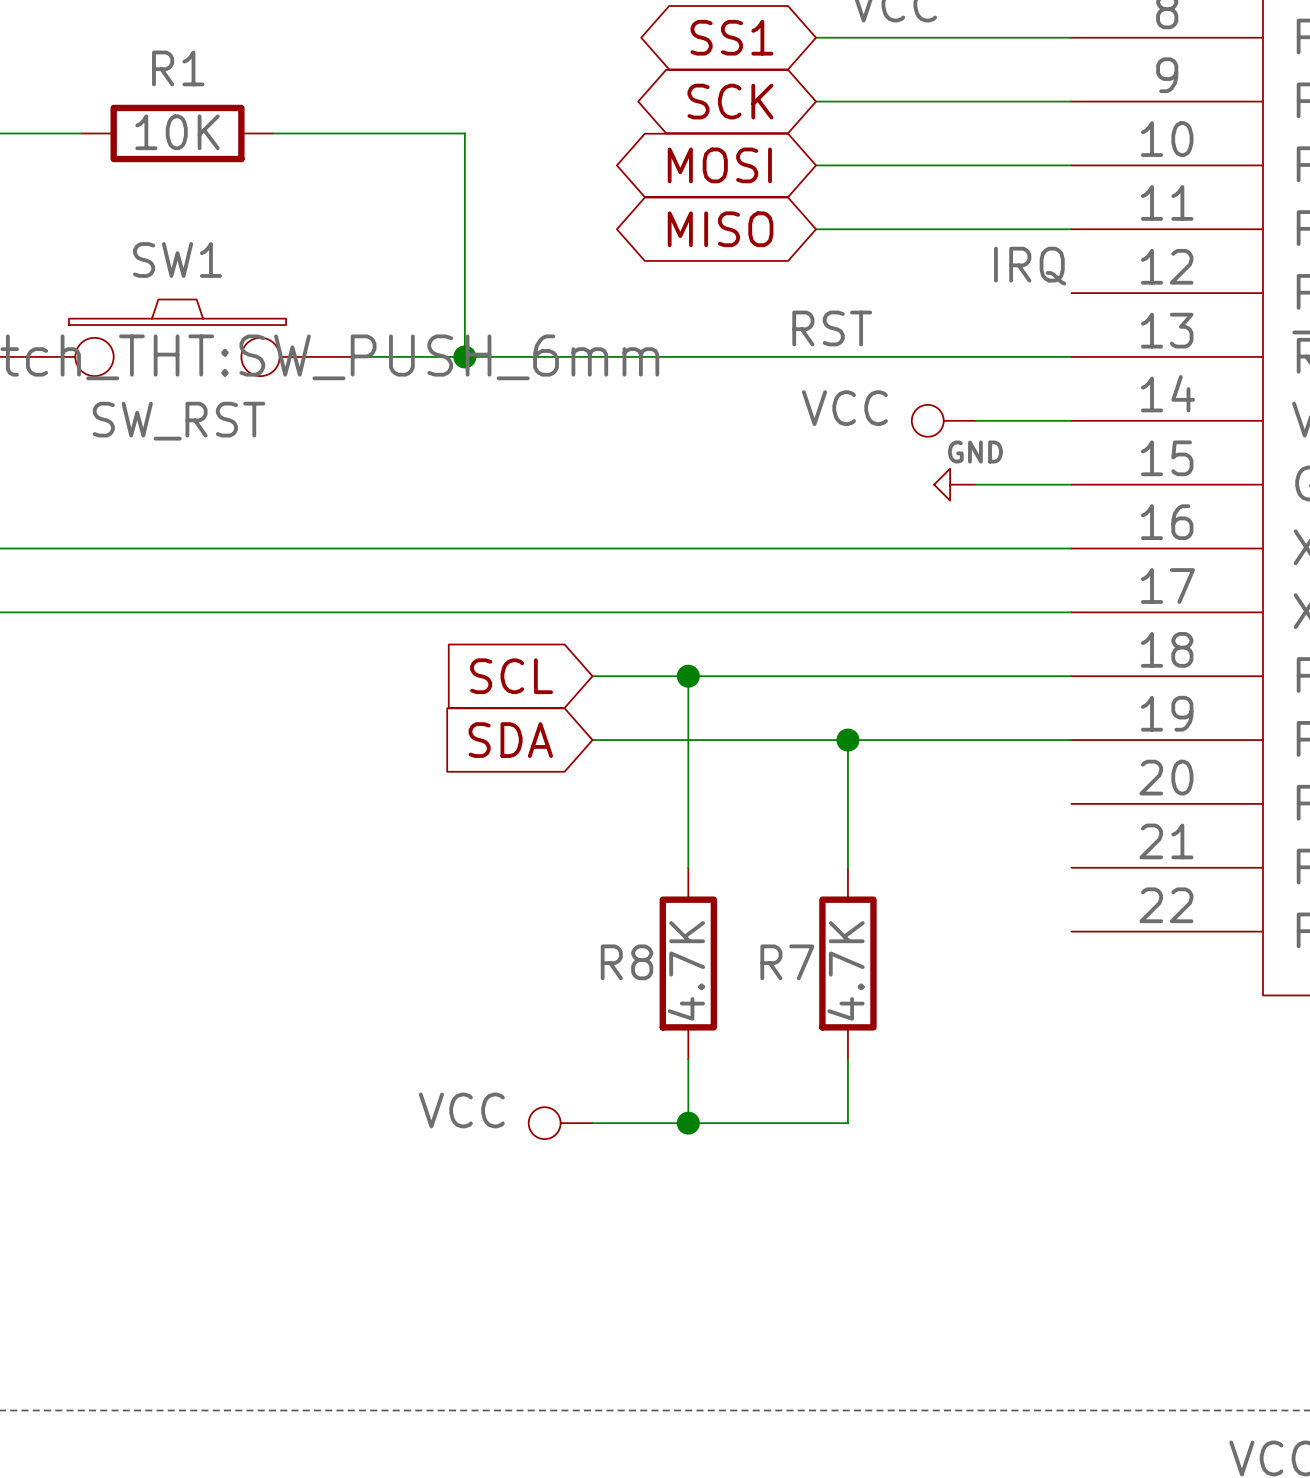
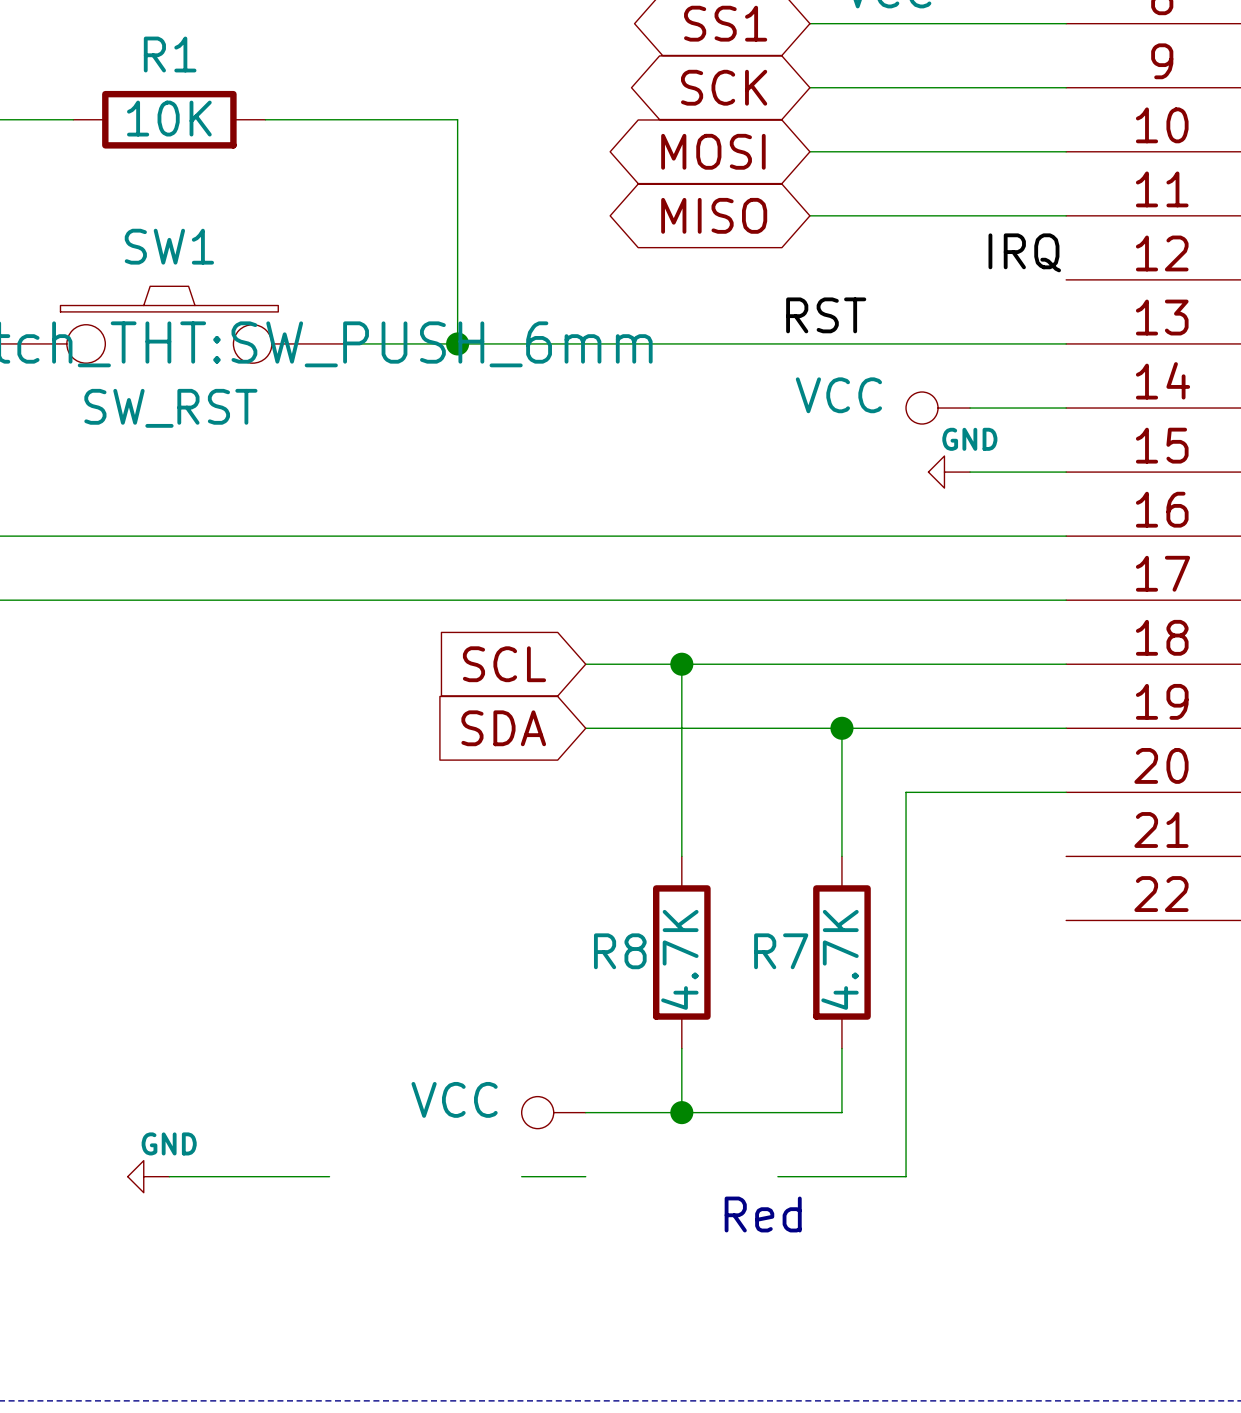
wire: none -> (1066, 792) (906, 792) (906, 1176) (777, 1176)
power symbol: none -> GND (148, 1176)
wire: none -> (169, 1176) (329, 1176)
wire: none -> (521, 1176) (585, 1176)
text: none -> Red (763, 1214)

